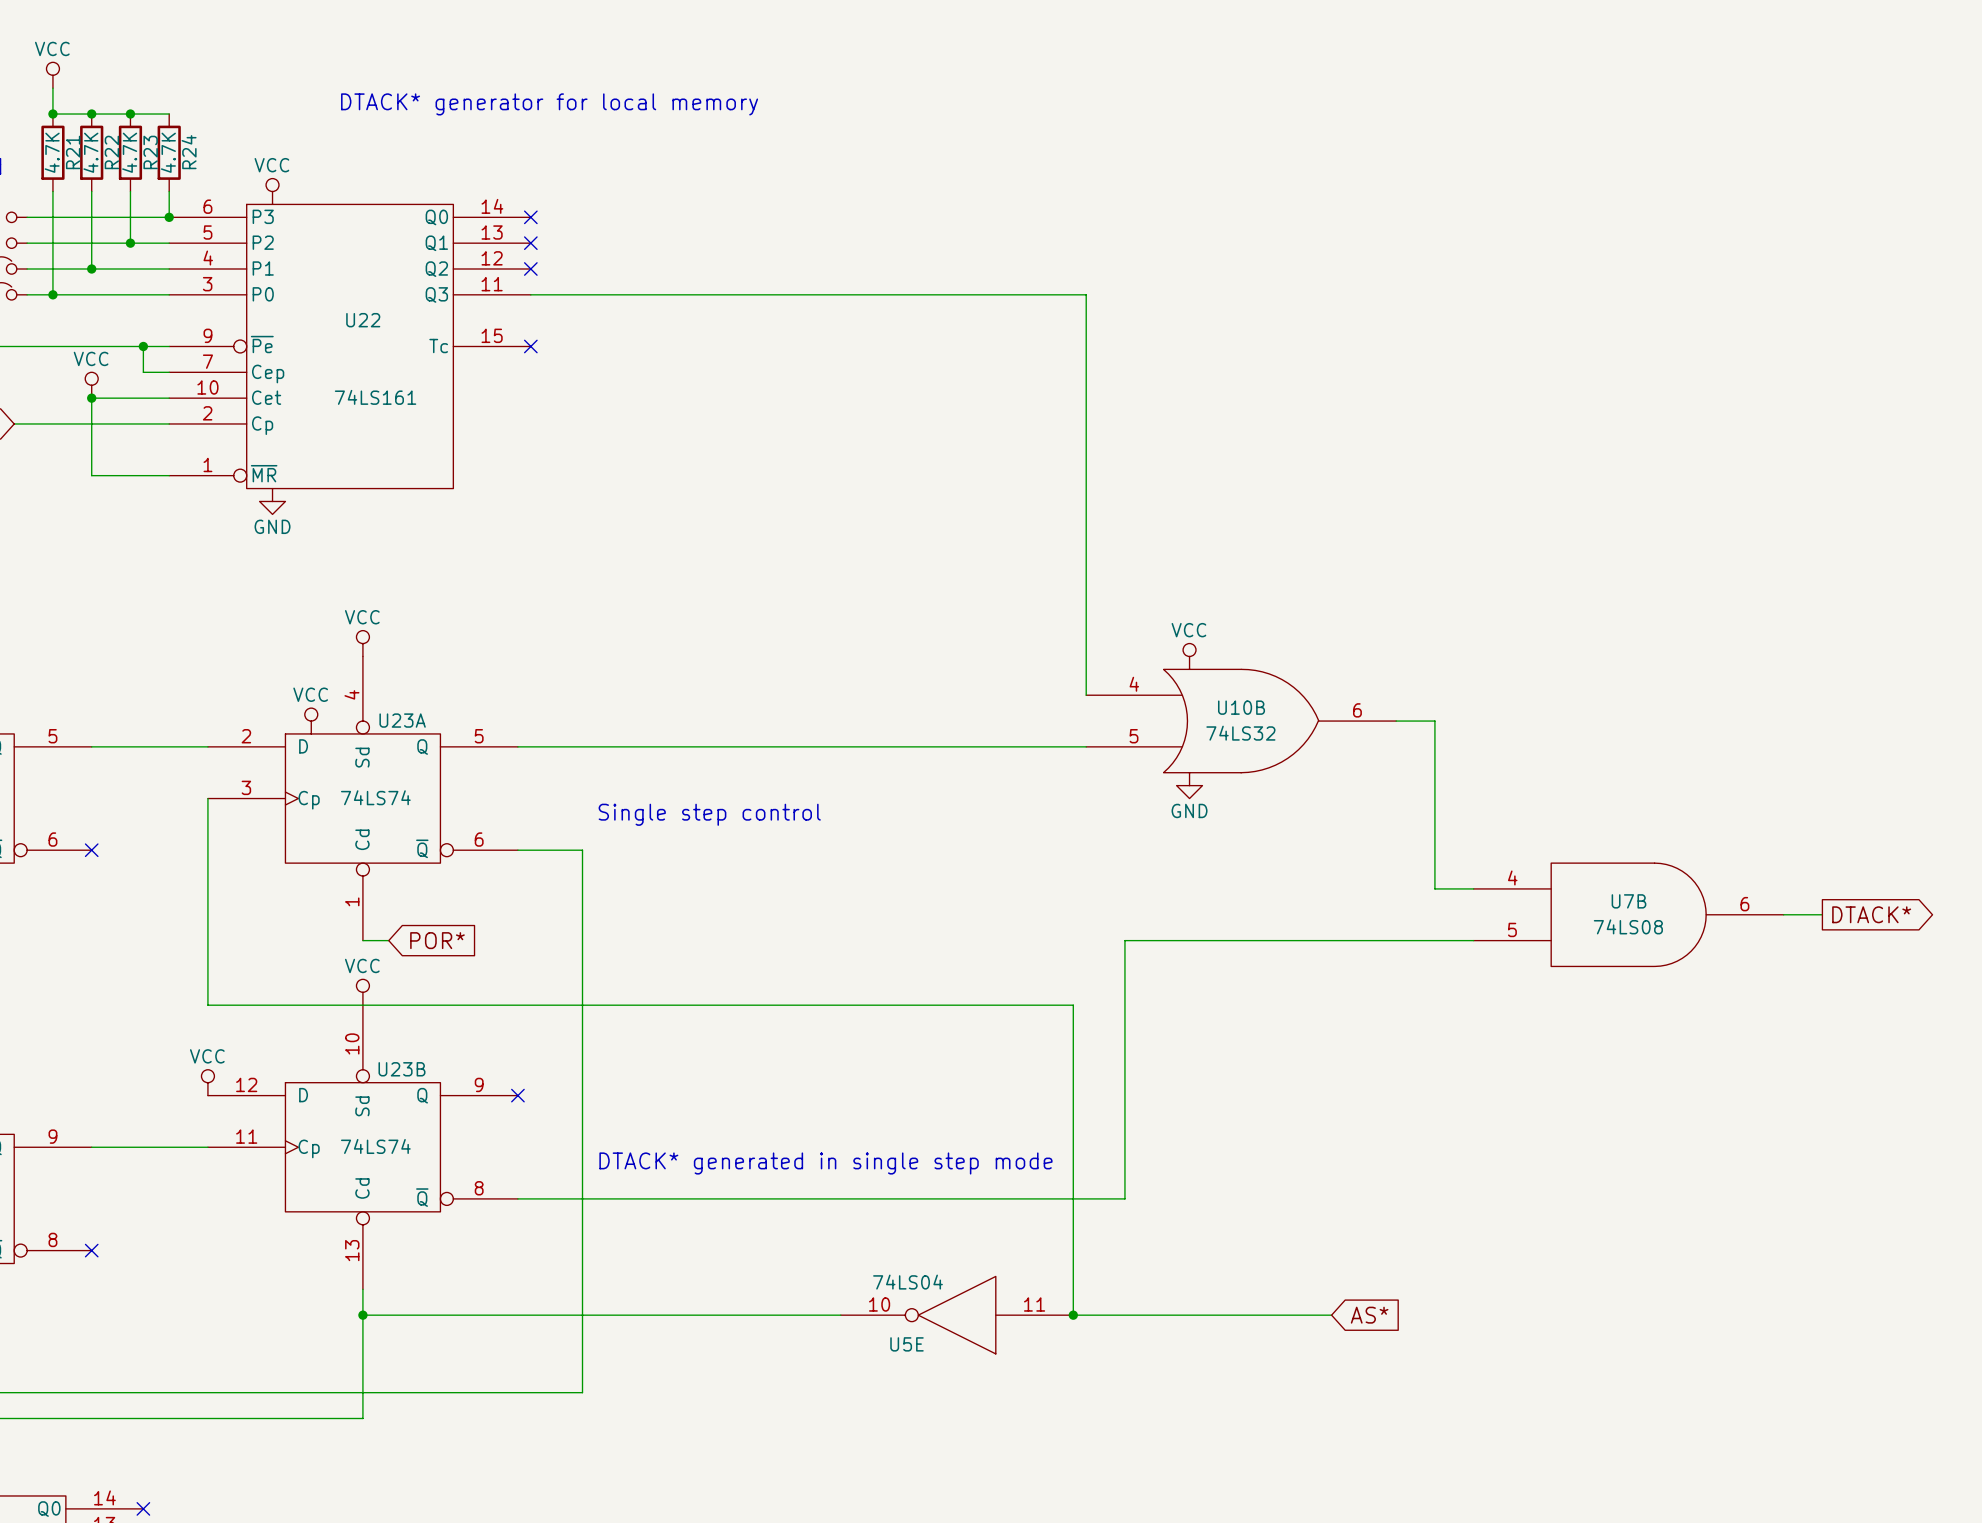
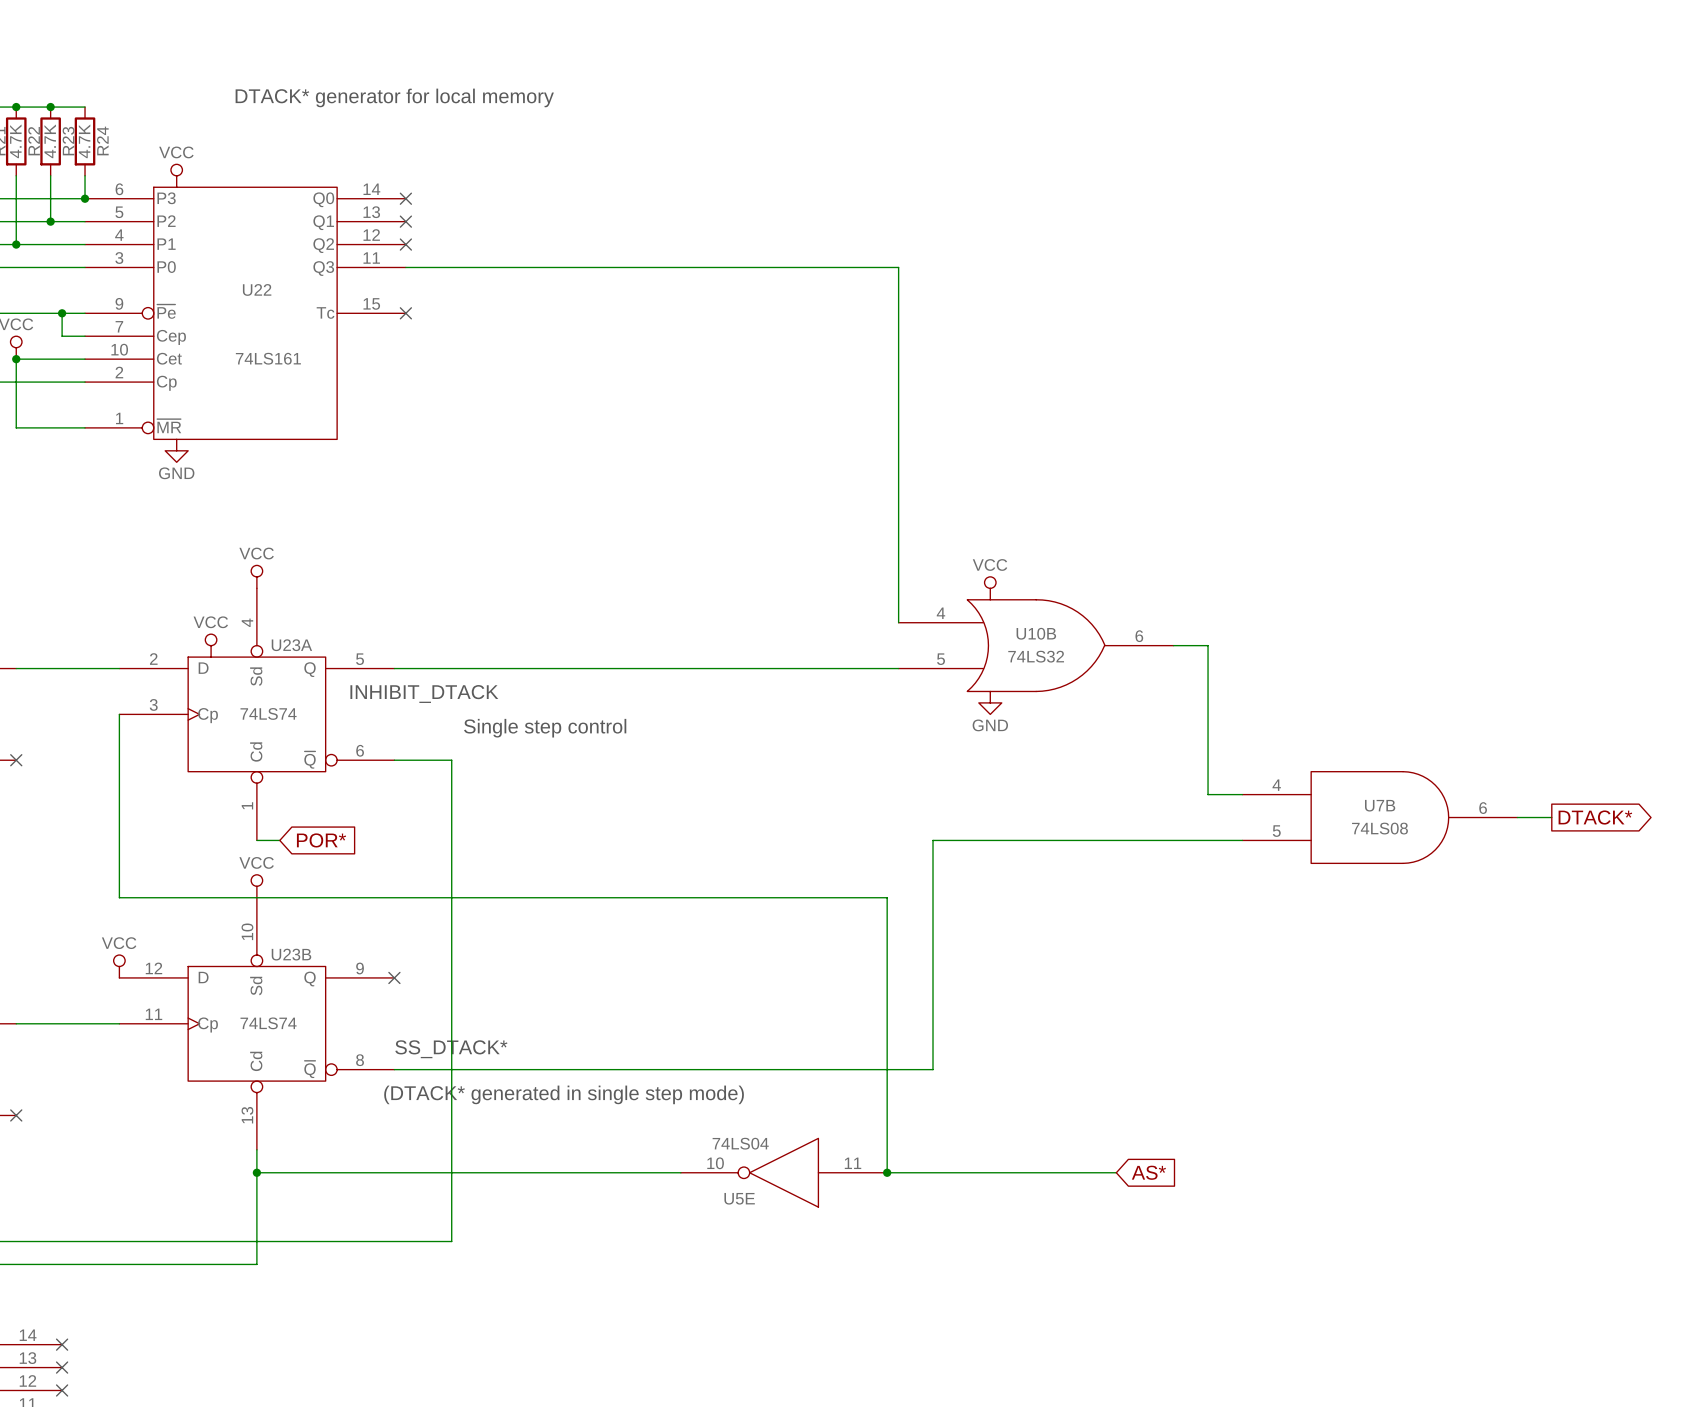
text: none -> INHIBIT_DTACK (424, 694)
text: DTACK* generated in single step mode (825, 1163) -> none
text: none -> SS_DTACK* (451, 1049)
text: none -> (DTACK* generated in single step mode) (564, 1094)

